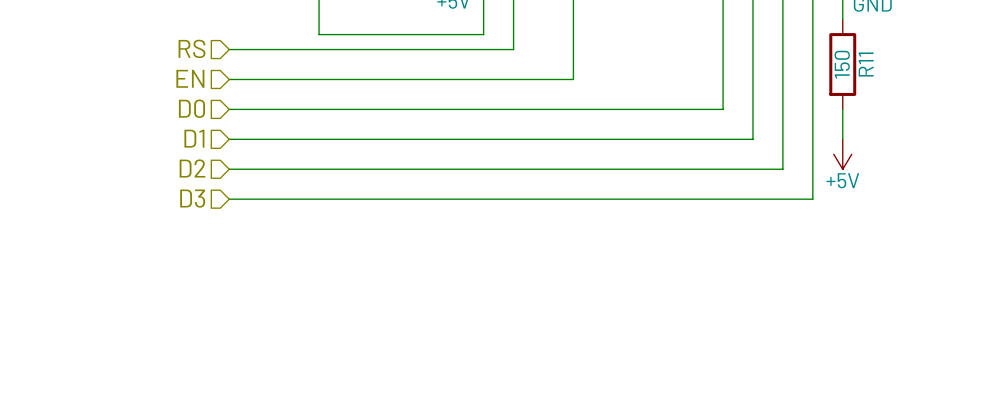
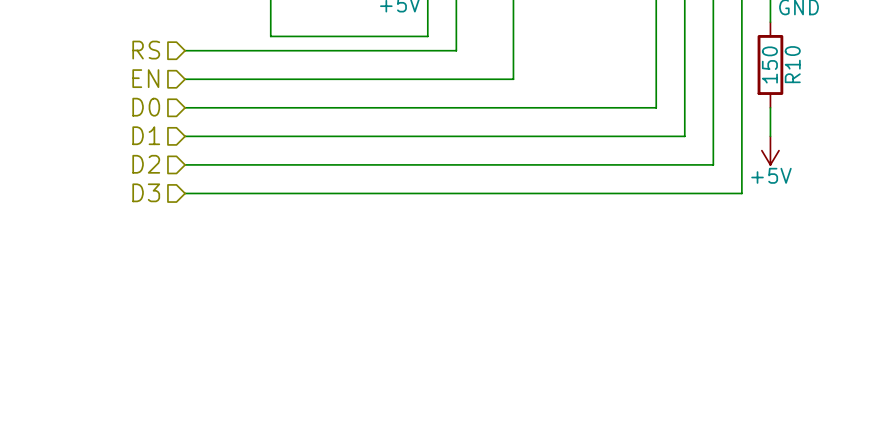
R11 name: R11 (866, 64) -> R10 (792, 64)

